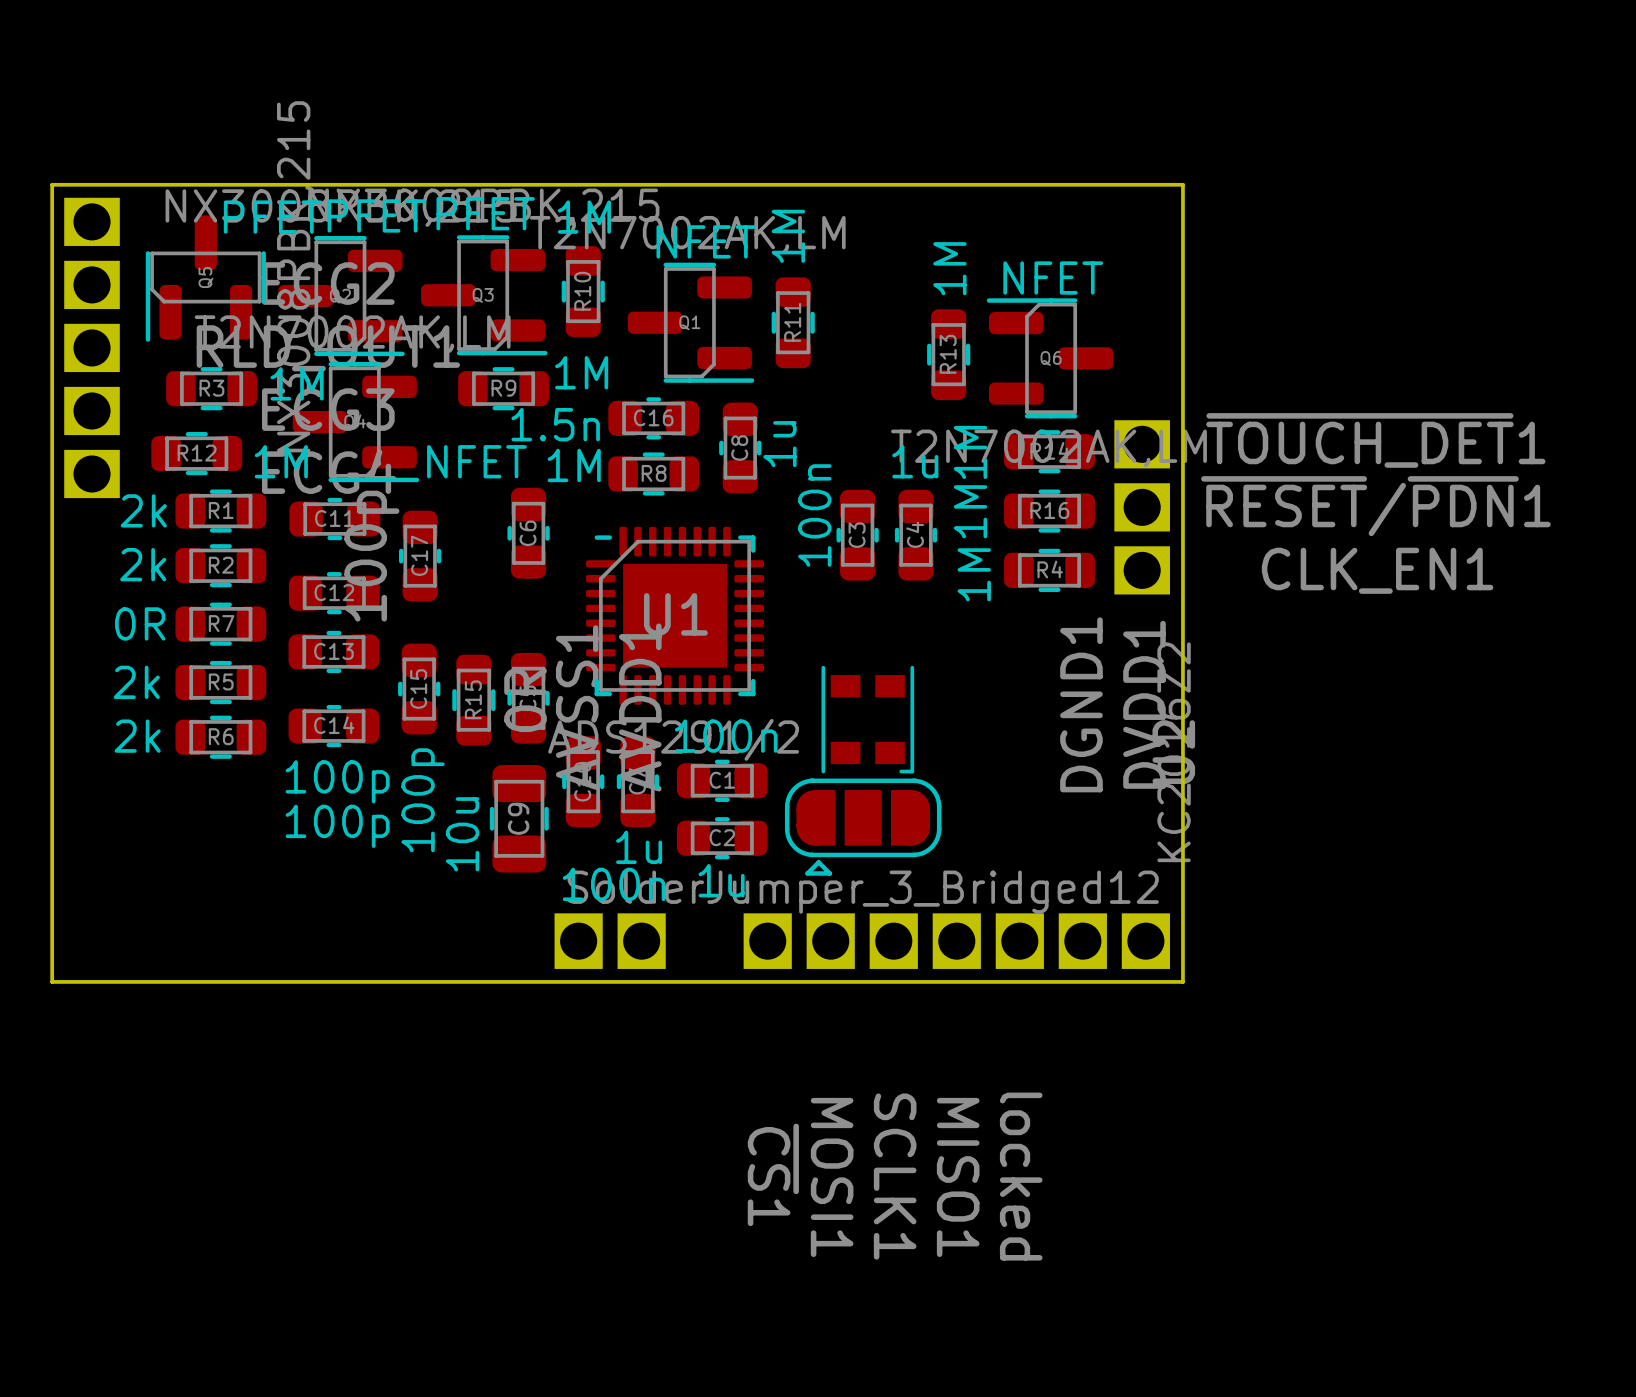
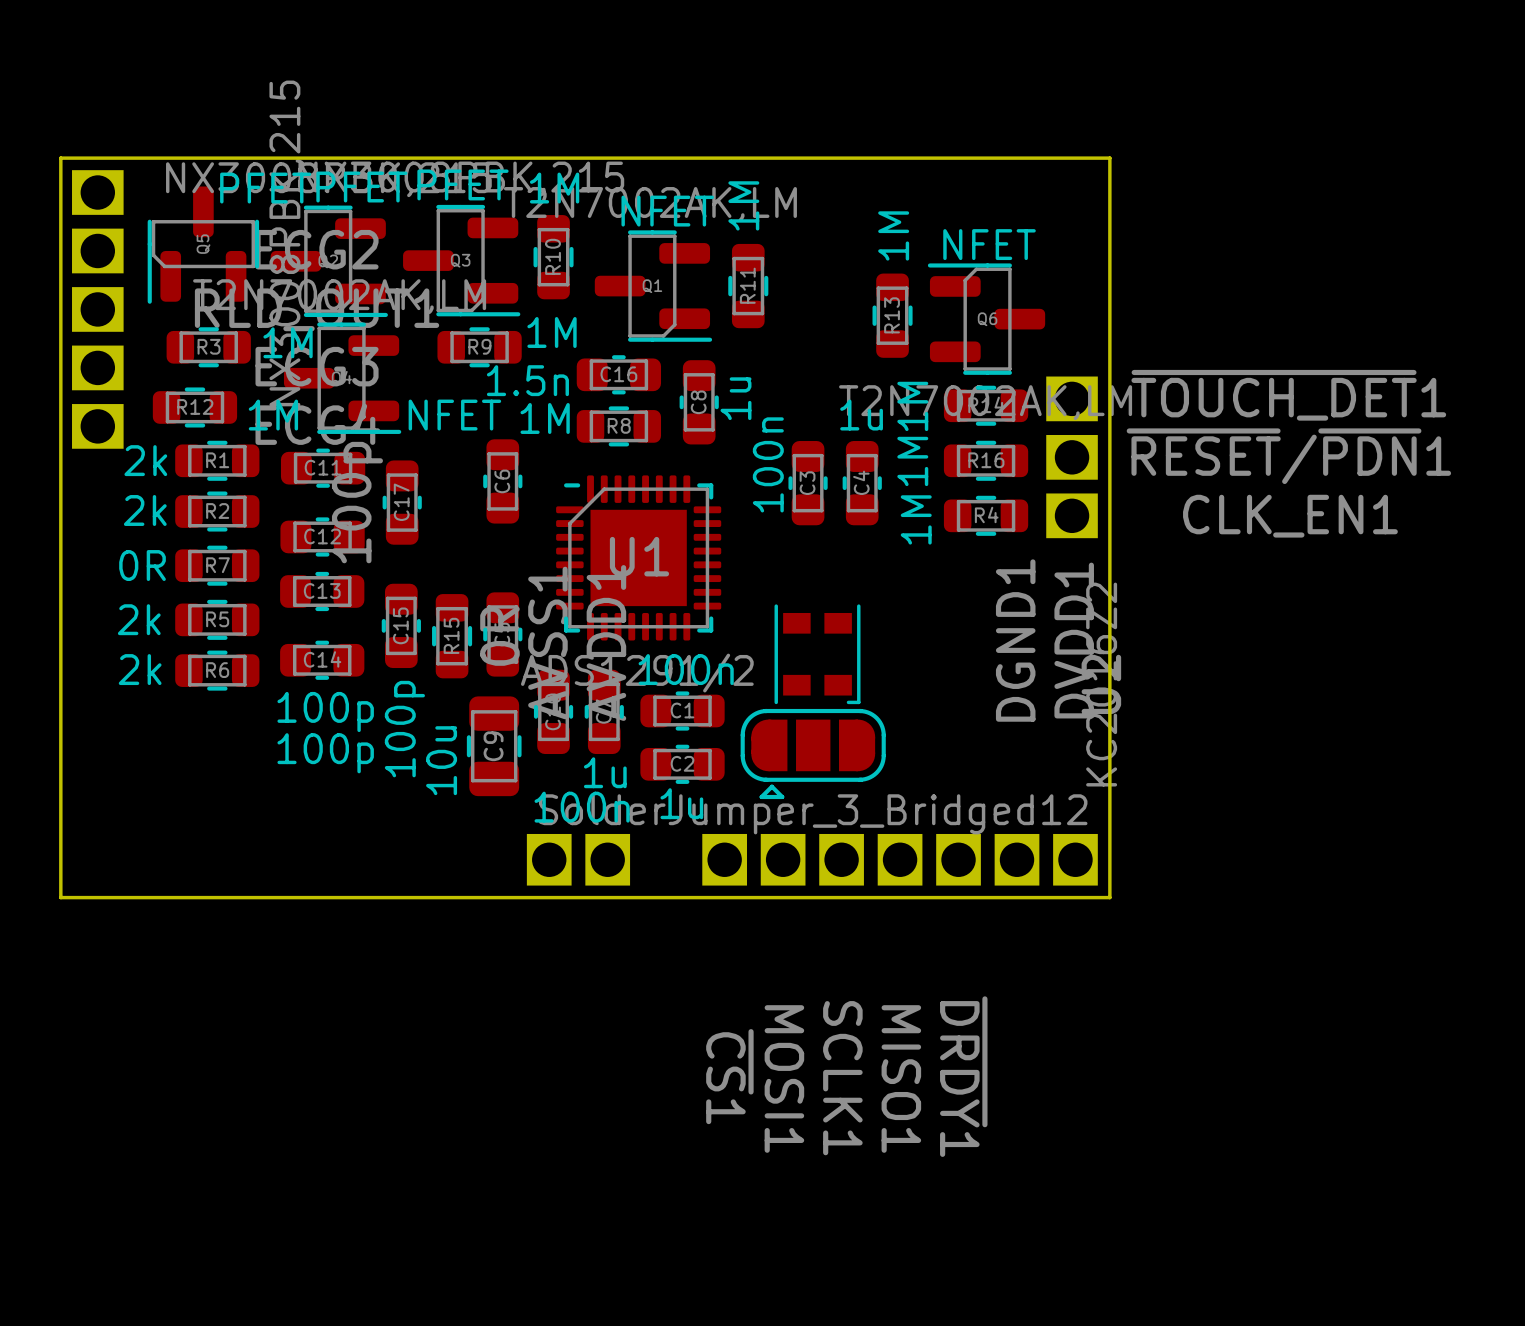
locked name: locked (1021, 1176) -> ~{DRDY}1 (963, 1076)

